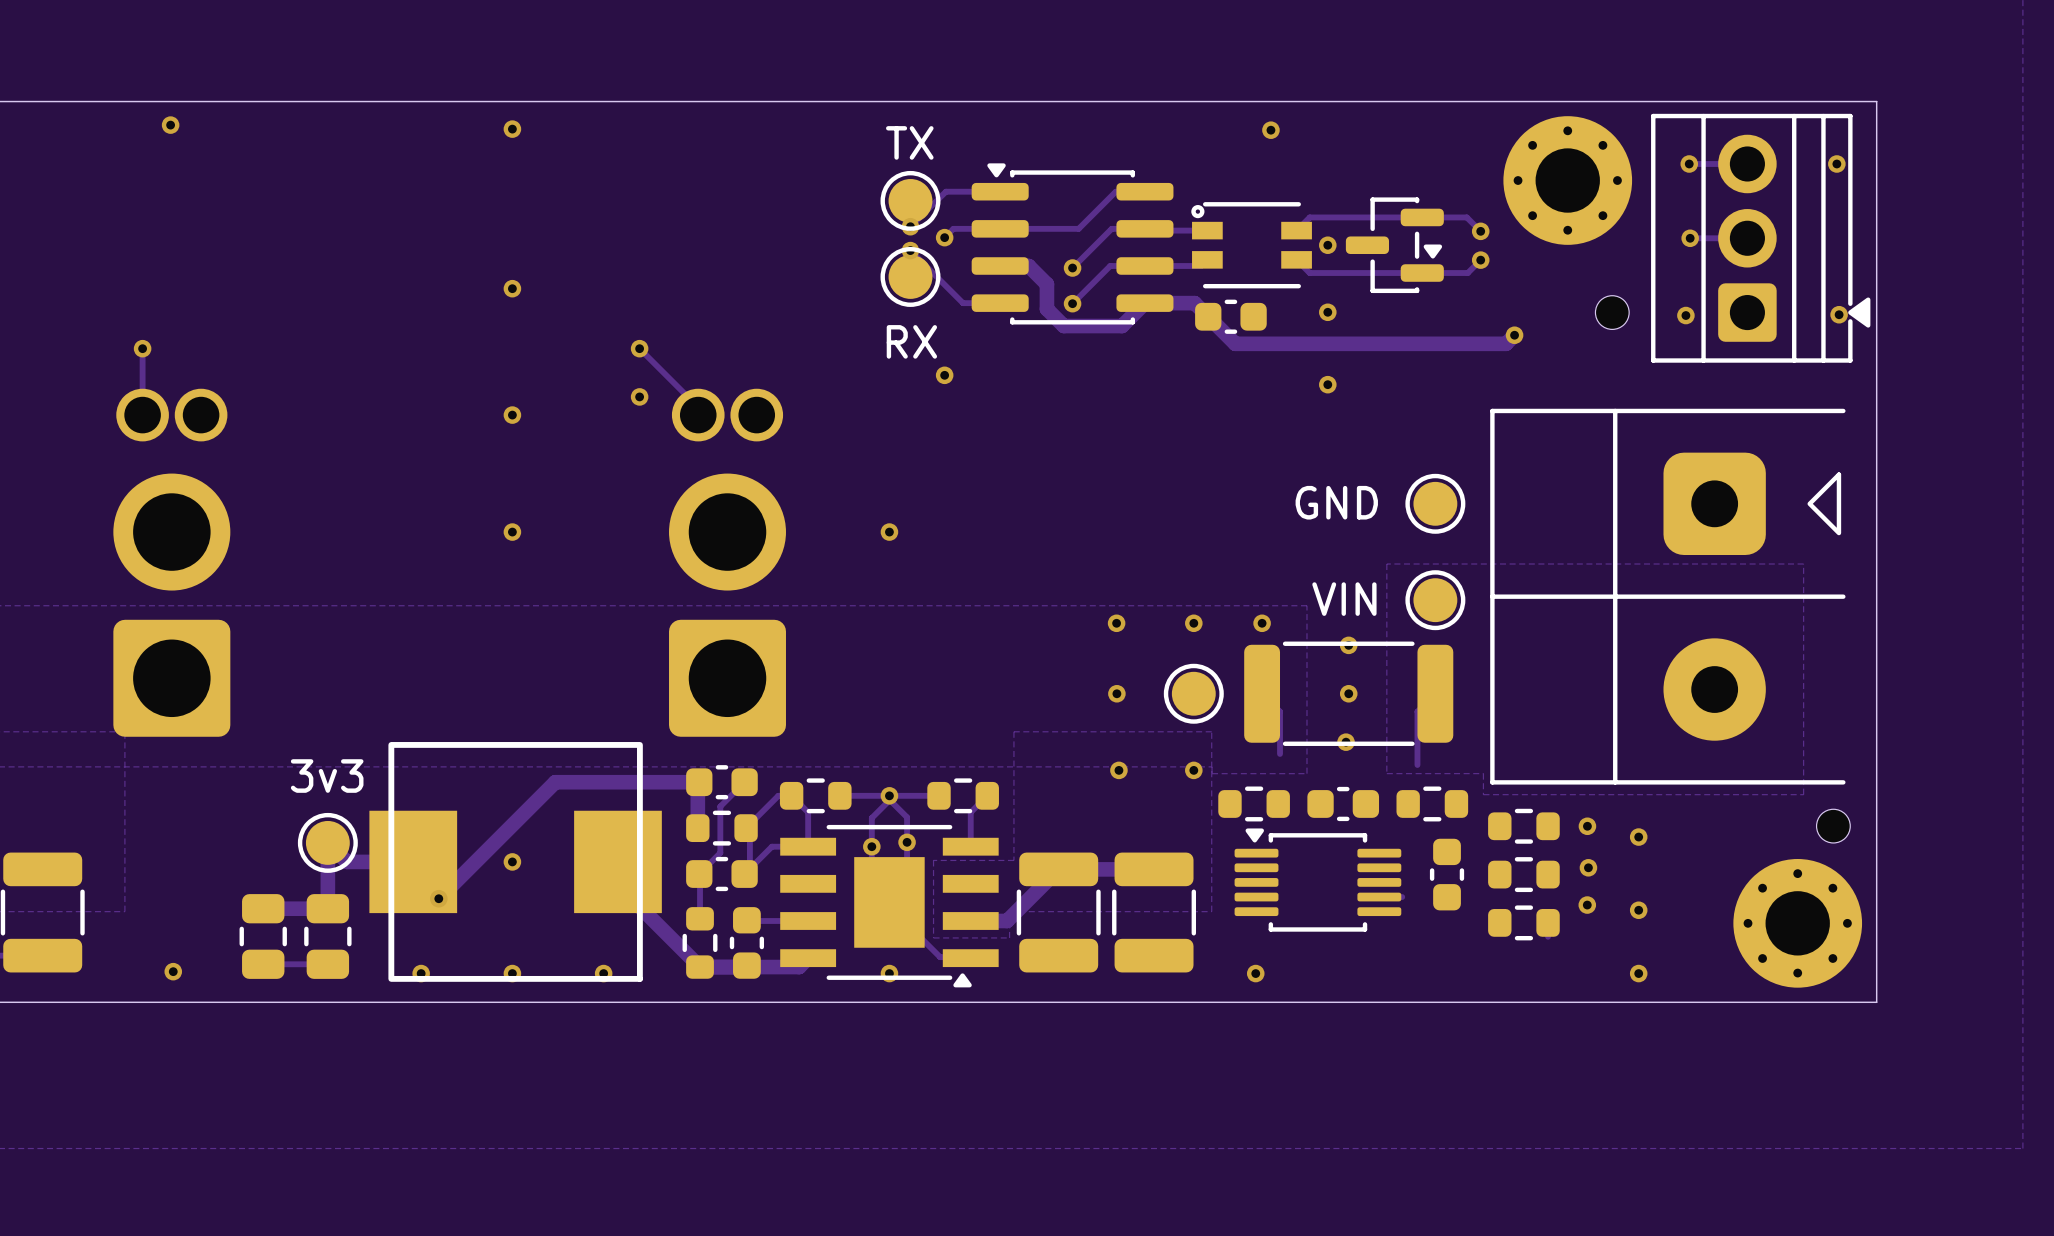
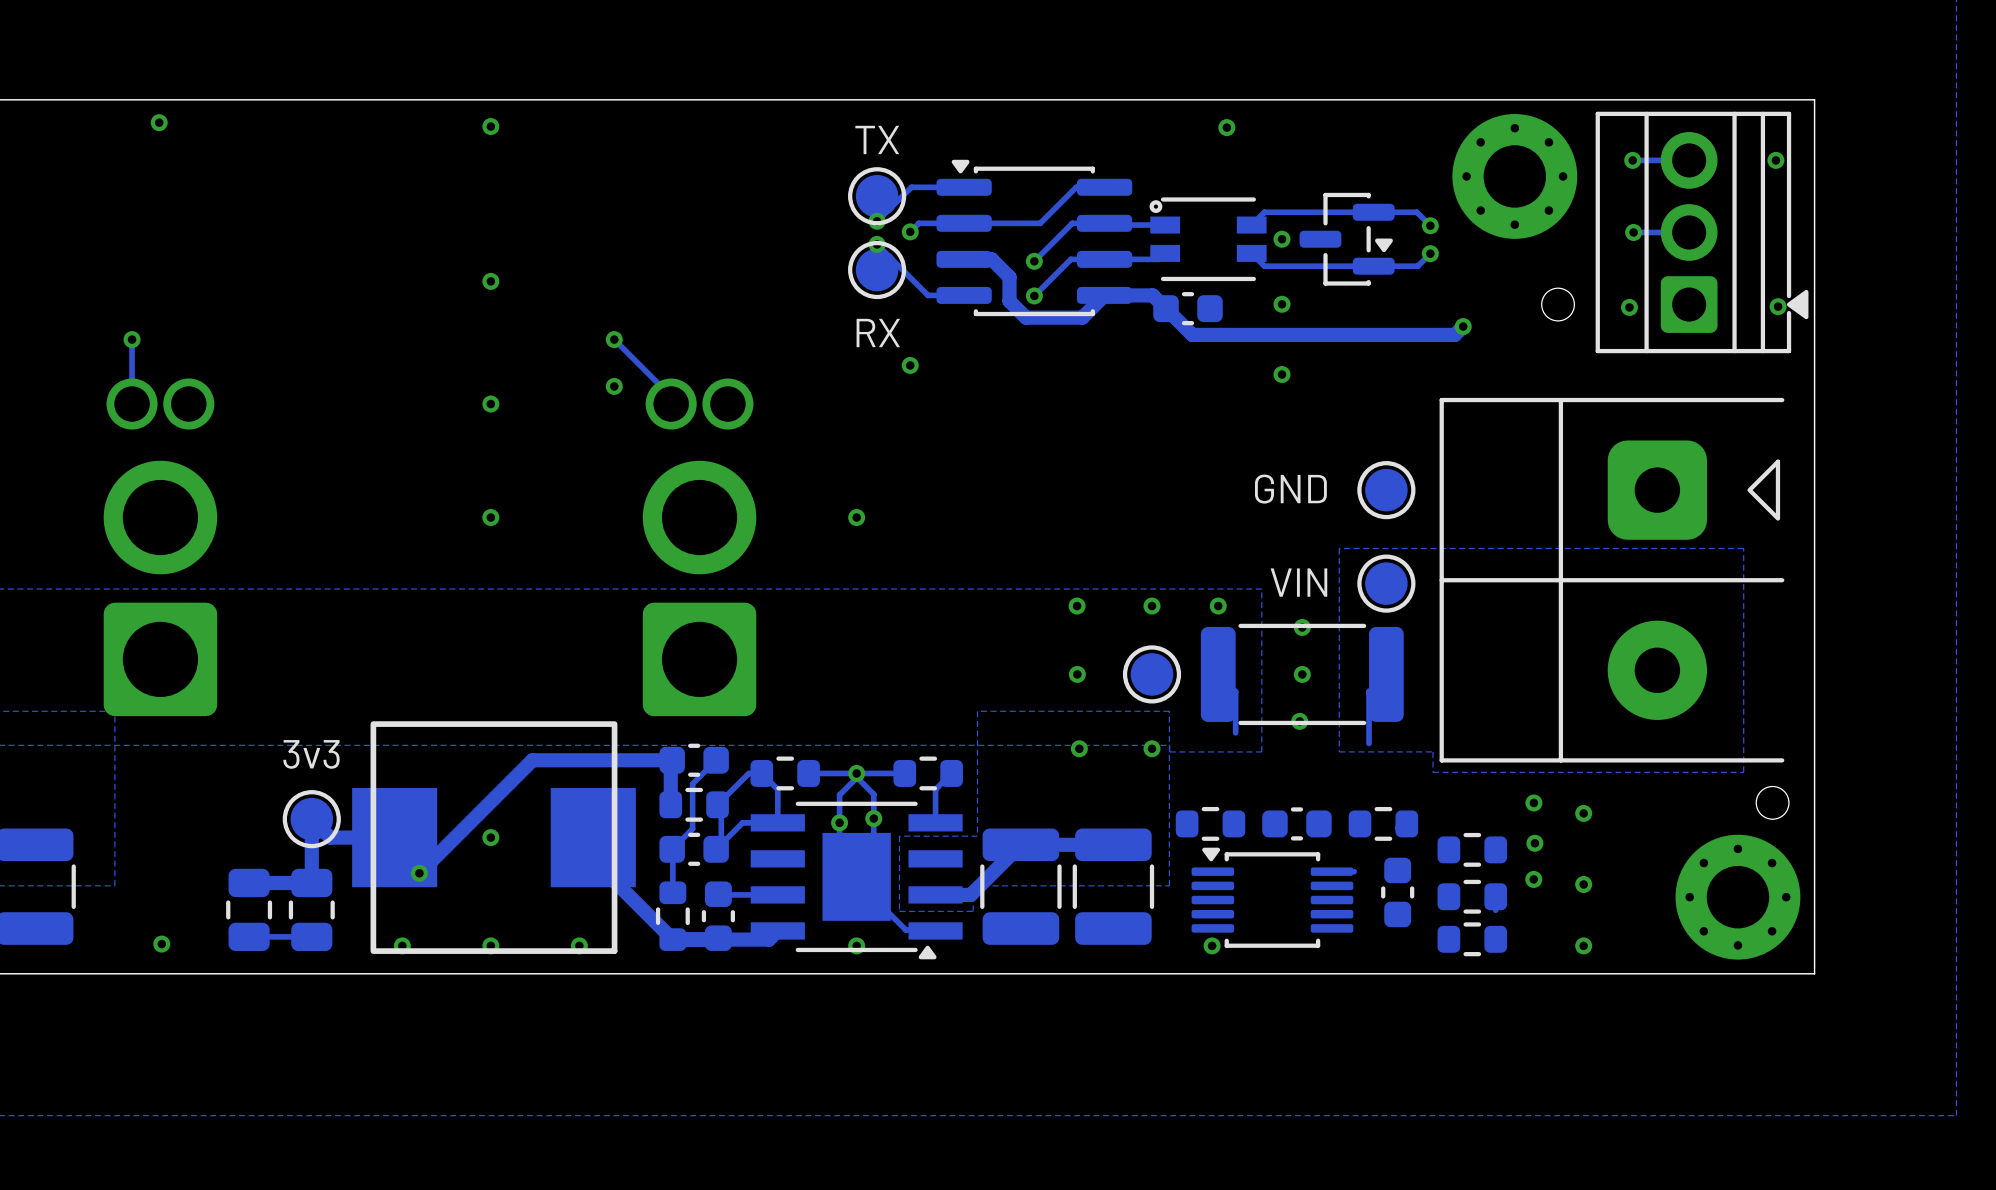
part position: (1254, 803) -> (1210, 823)
part position: (1343, 803) -> (1296, 823)
part position: (1432, 803) -> (1383, 823)
part: (1523, 826) -> none
part position: (1447, 874) -> (1397, 892)
part position: (1317, 880) -> (1272, 897)
part: none -> (1472, 939)

